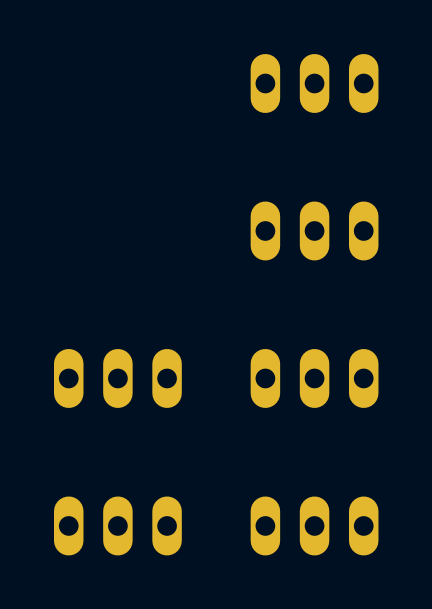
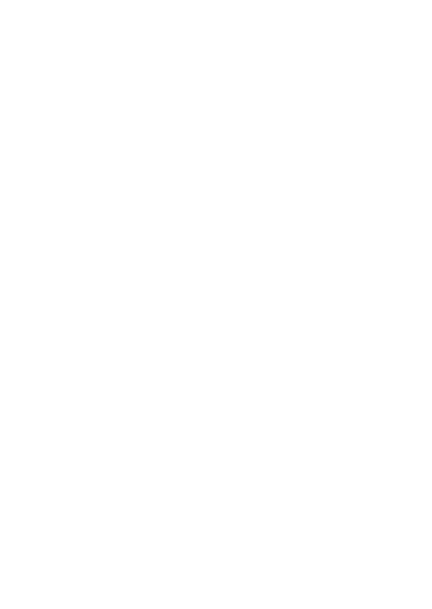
part: (314, 83) -> none
part: (314, 230) -> none
part: (117, 378) -> none
part: (314, 378) -> none
part: (117, 525) -> none
part: (314, 525) -> none

